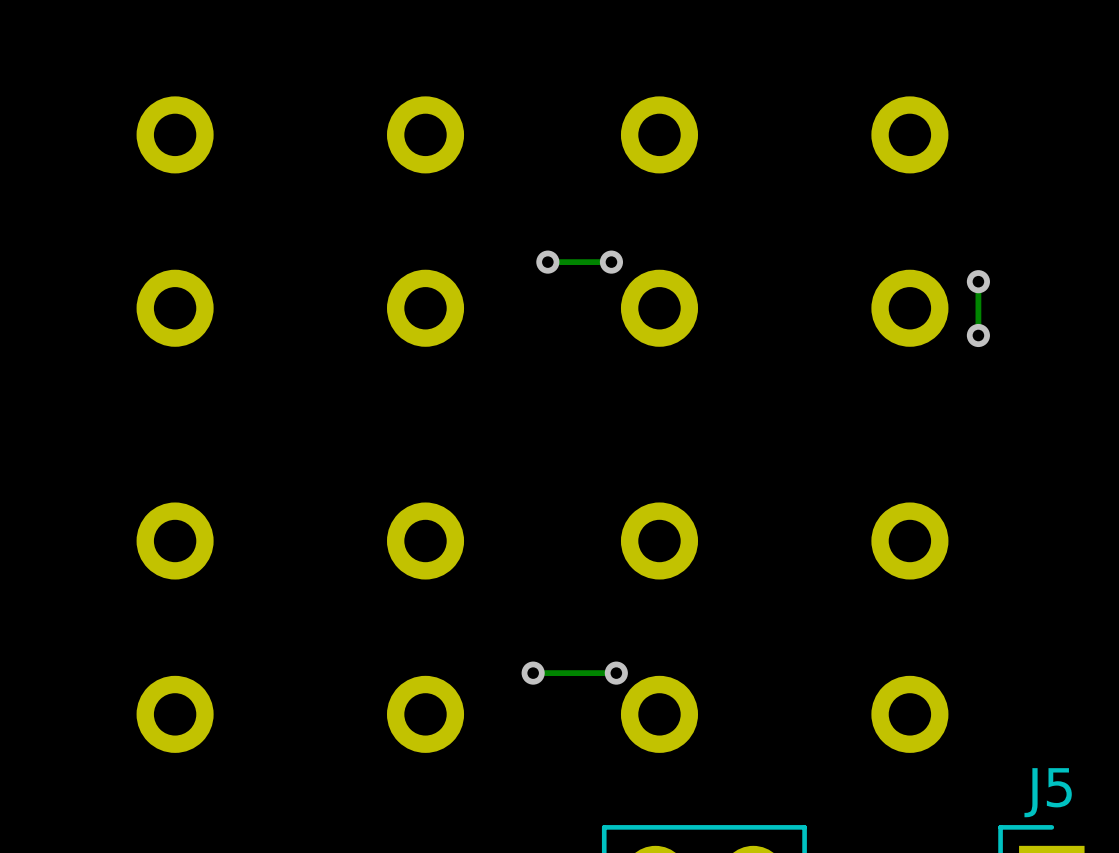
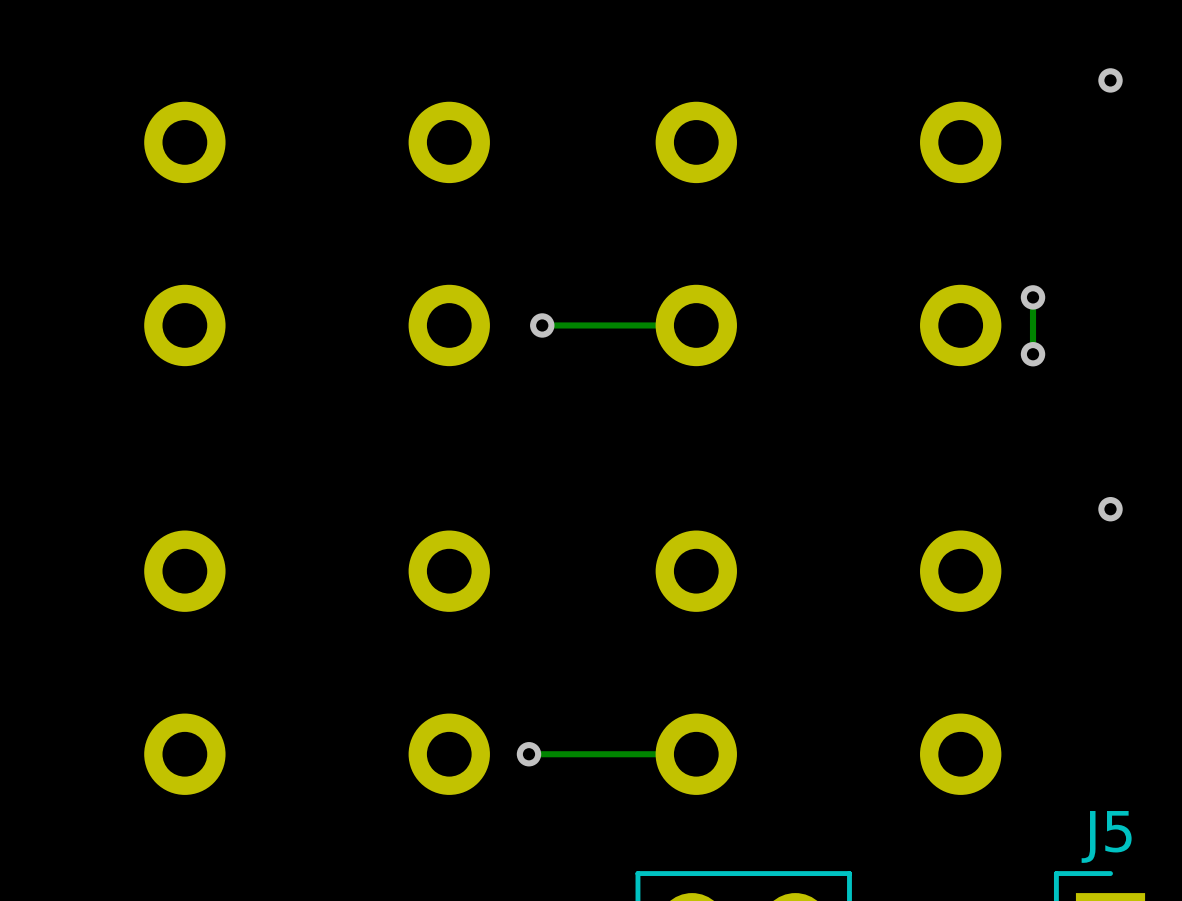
via: none -> (1110, 80)
via: (547, 262) -> none
track: (611, 262) (547, 262) -> none
via: (611, 262) -> none
via: none -> (542, 325)
track: none -> (696, 325) (542, 325)
via: none -> (1110, 509)
via position: (533, 673) -> (528, 754)
track: (616, 673) (533, 673) -> none
via: (616, 673) -> none
track: none -> (696, 754) (528, 754)

